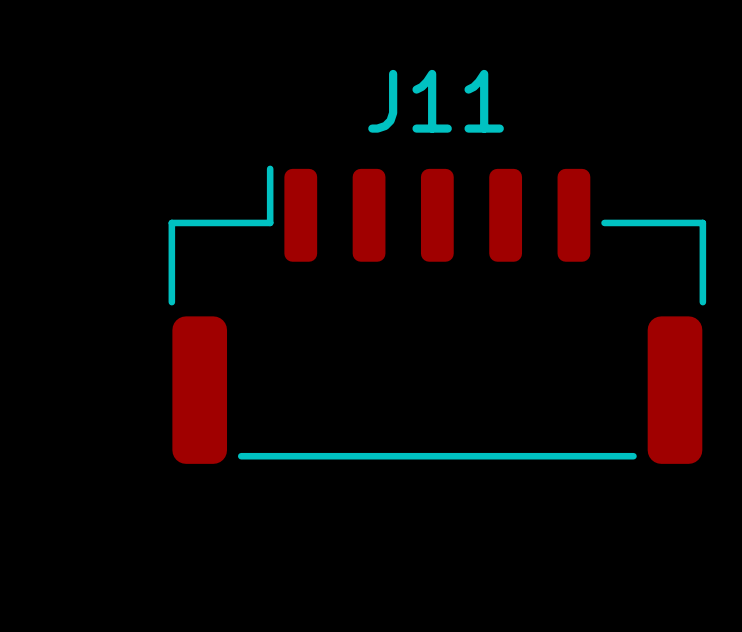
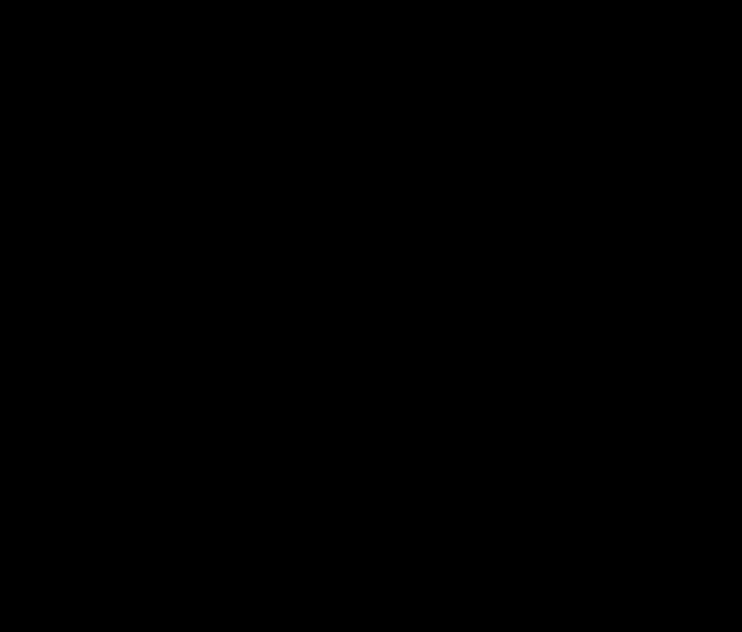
J11: (437, 314) -> none

